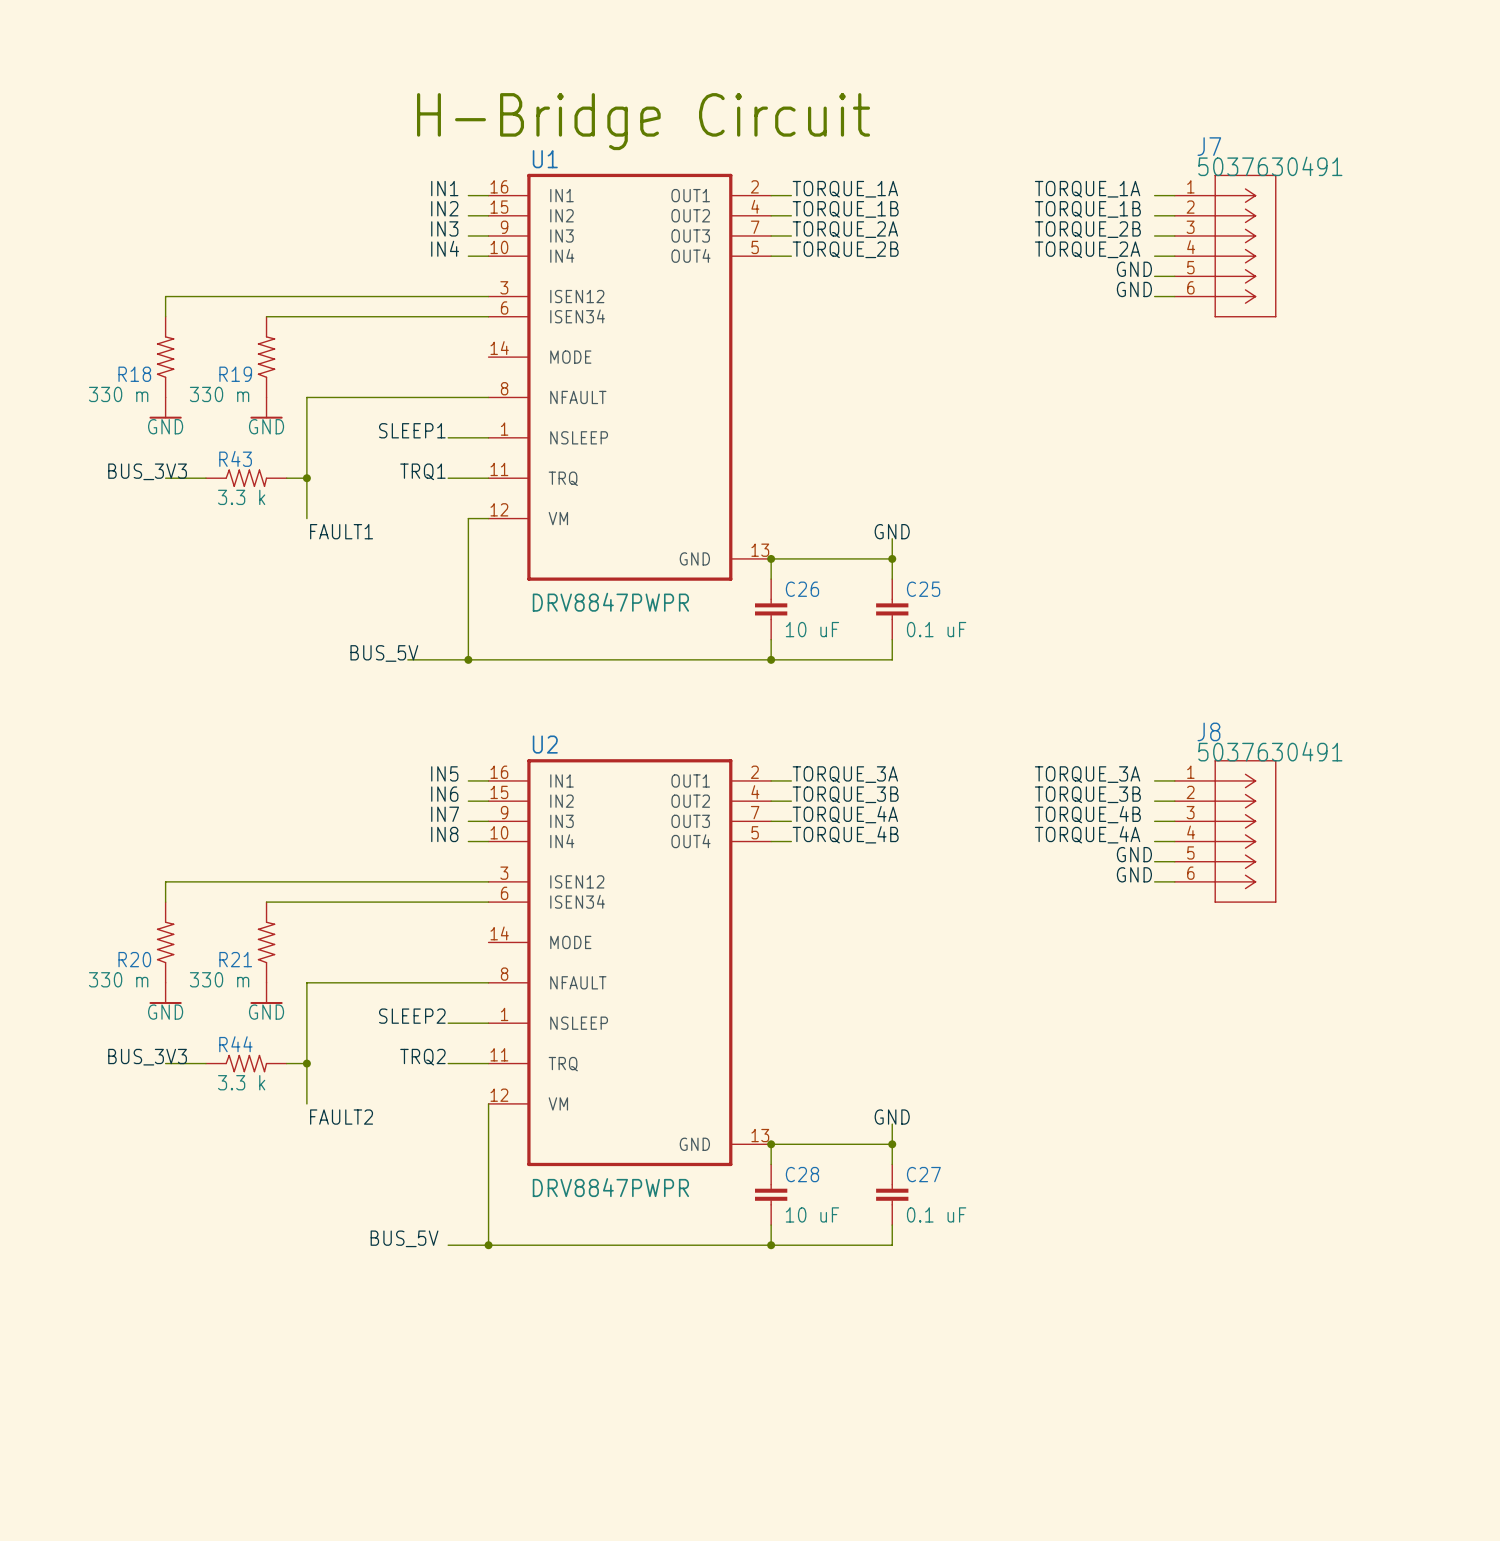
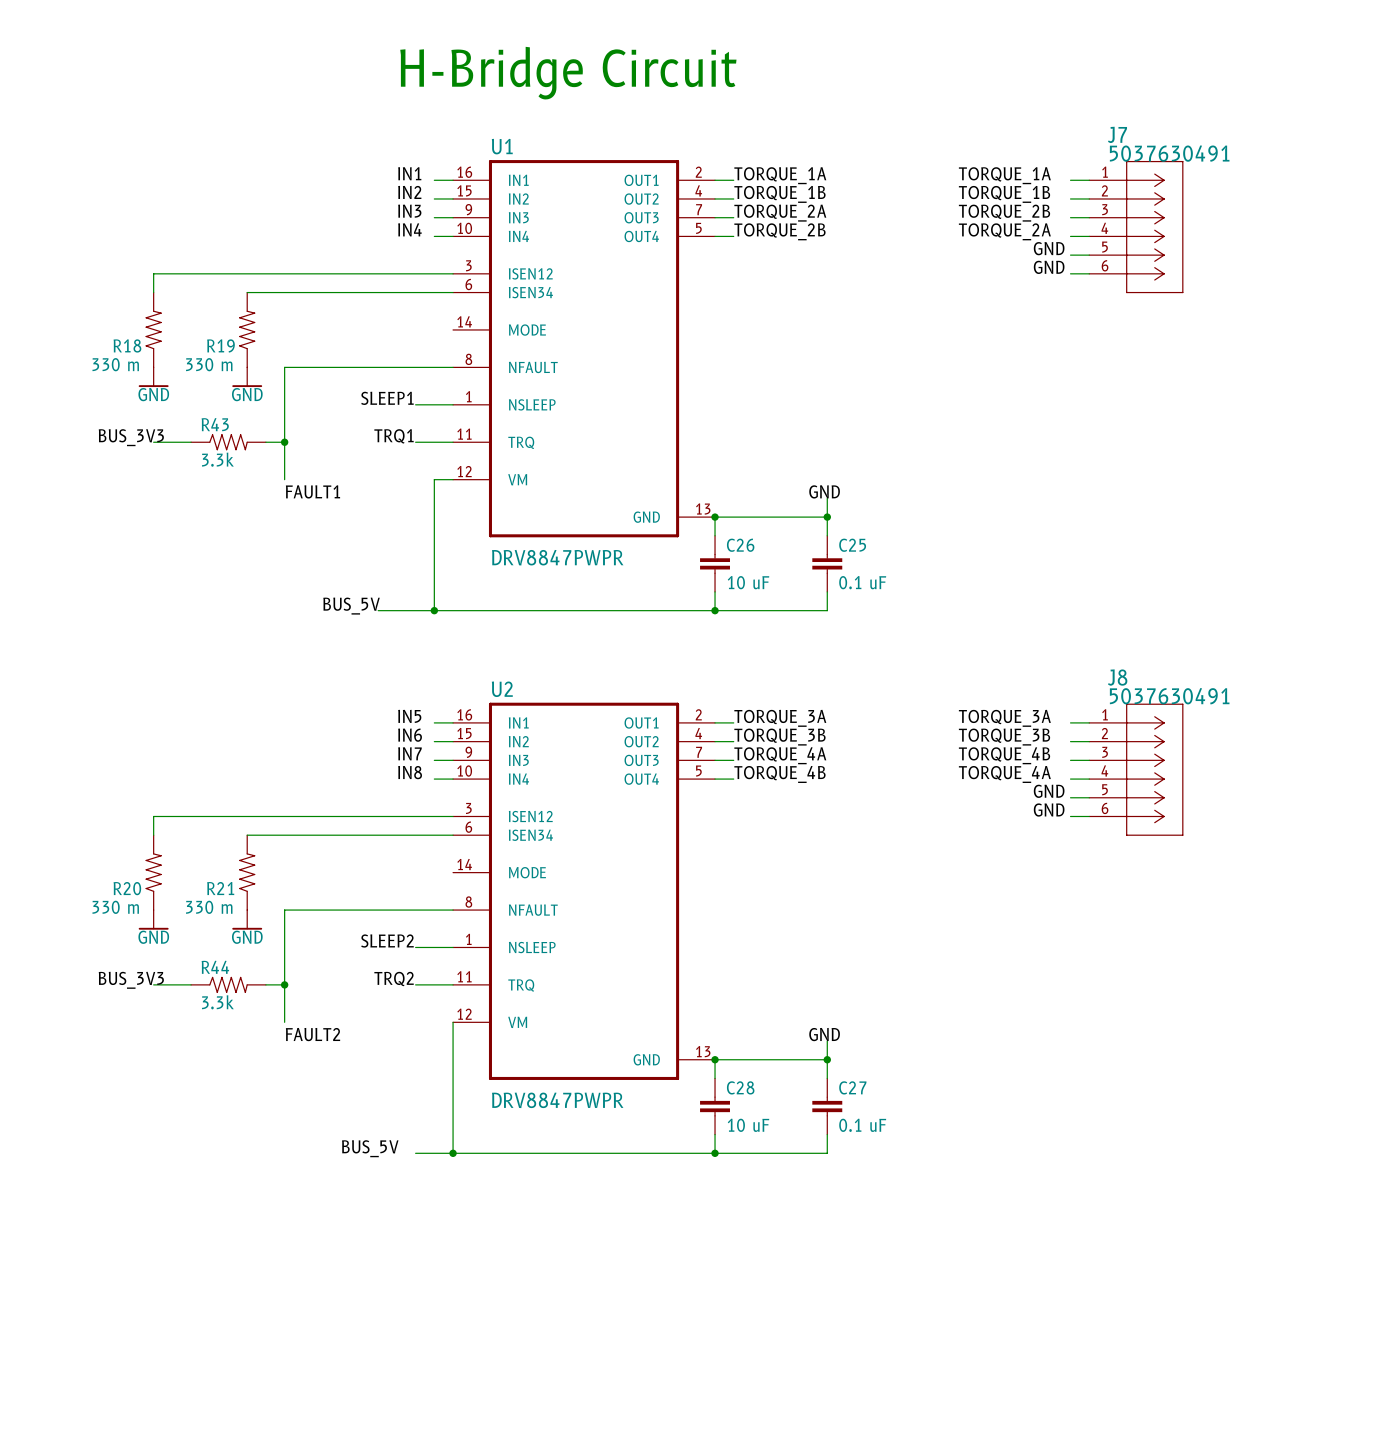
text position: H-Bridge Circuit (643, 121) -> H-Bridge Circuit (568, 73)
R43 value: 3.3 k (241, 497) -> 3.3k (217, 459)
R44 value: 3.3 k (241, 1082) -> 3.3k (217, 1002)

